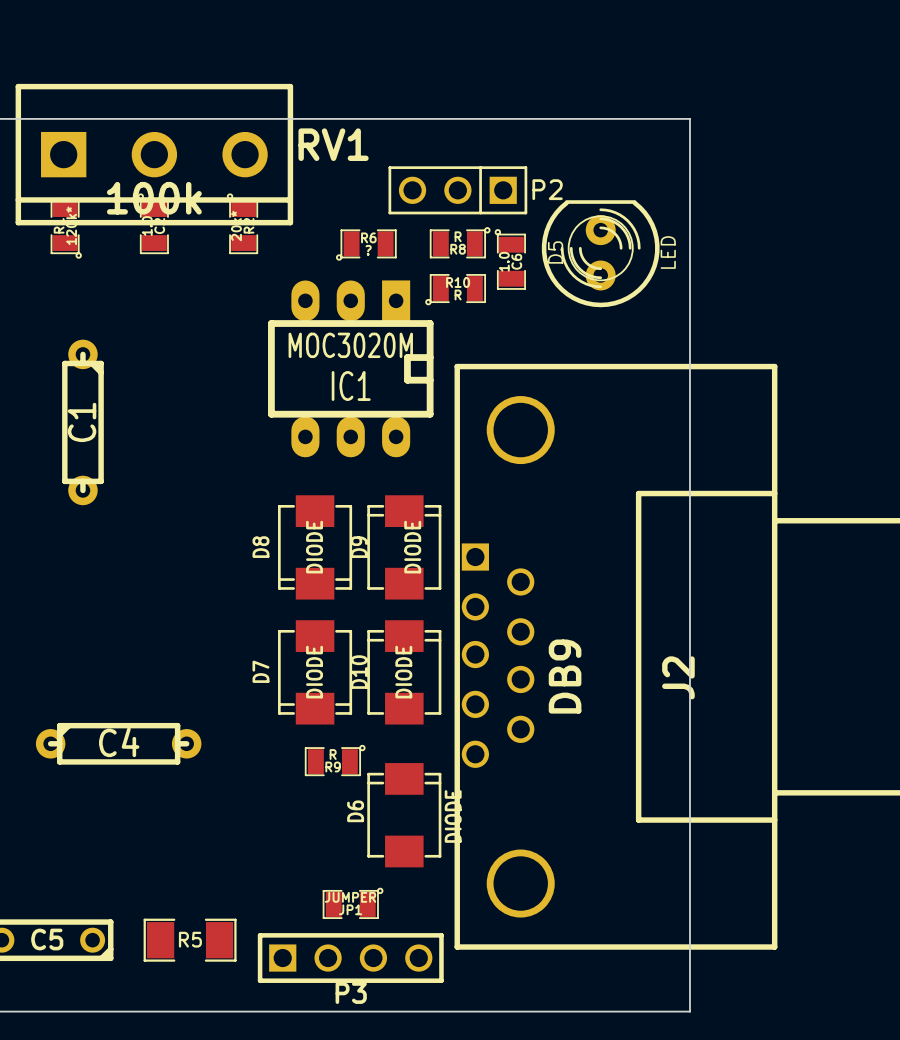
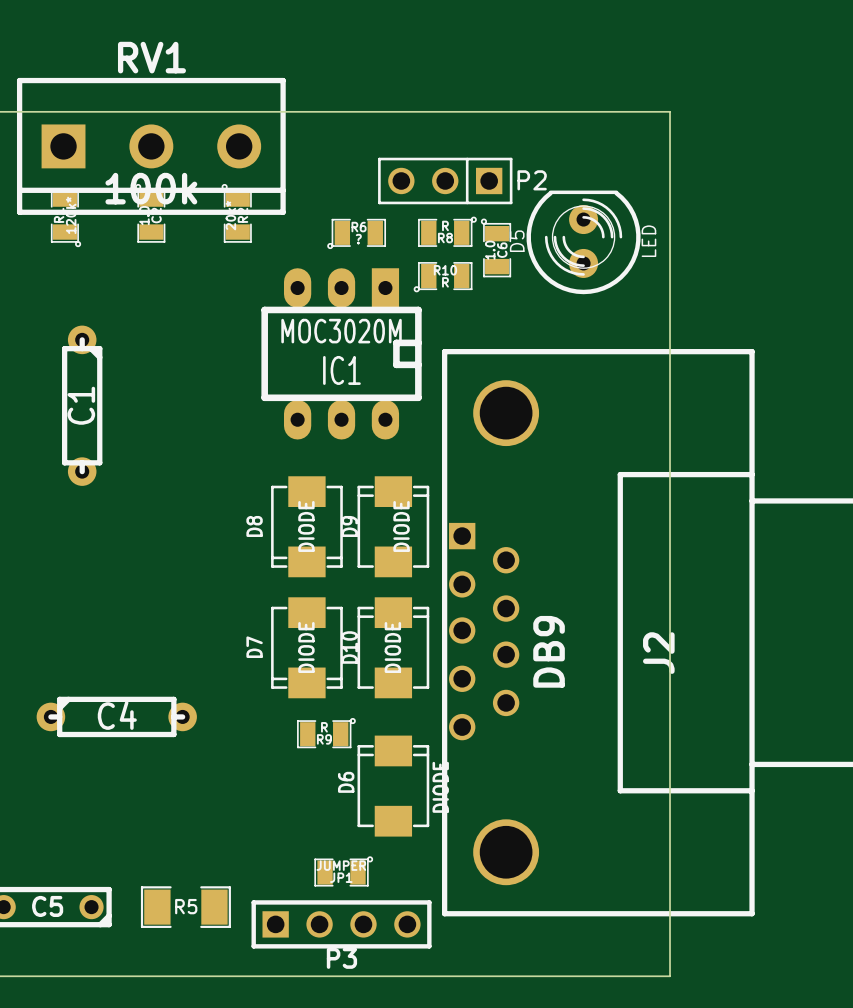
RV1 name position: RV1 (333, 144) -> RV1 (151, 57)
D5 name position: D5 (555, 252) -> D5 (517, 241)

